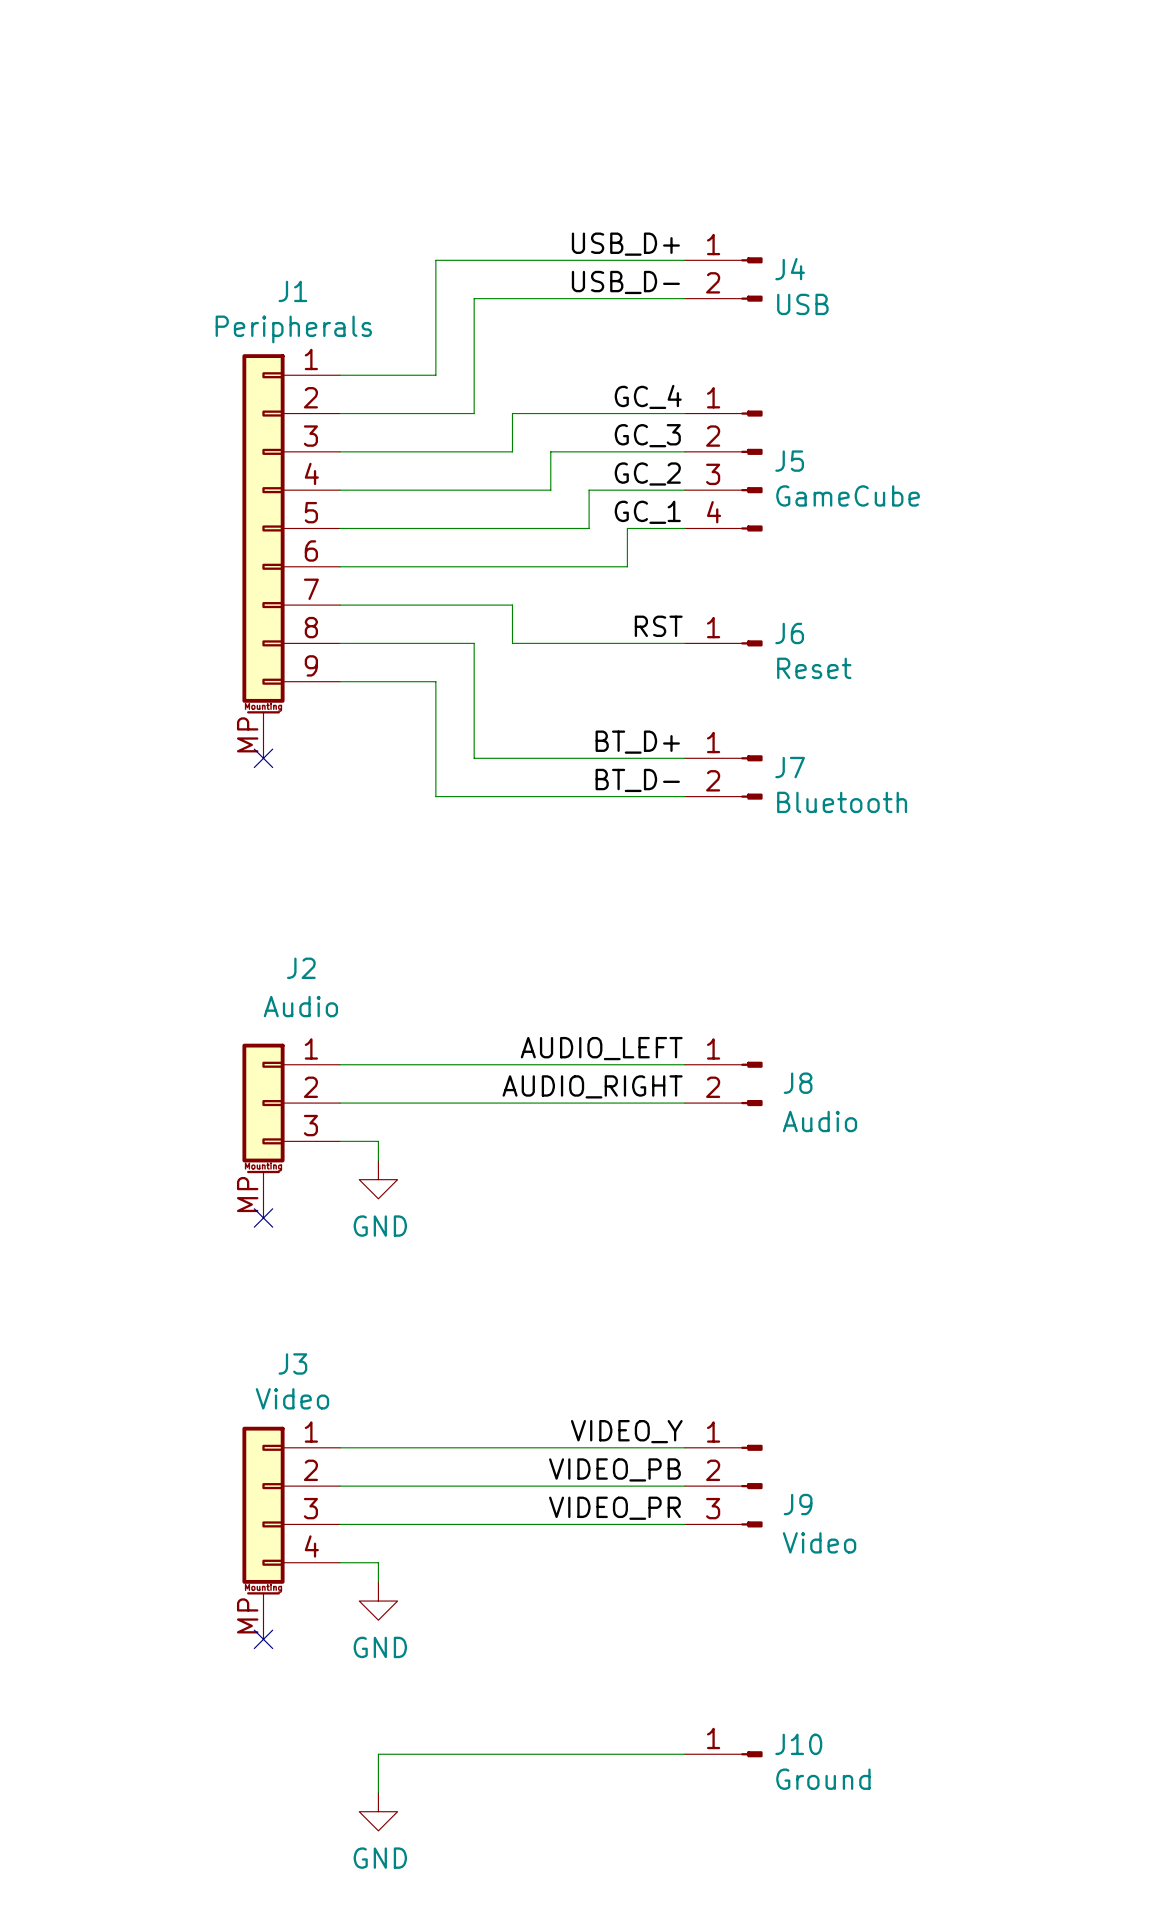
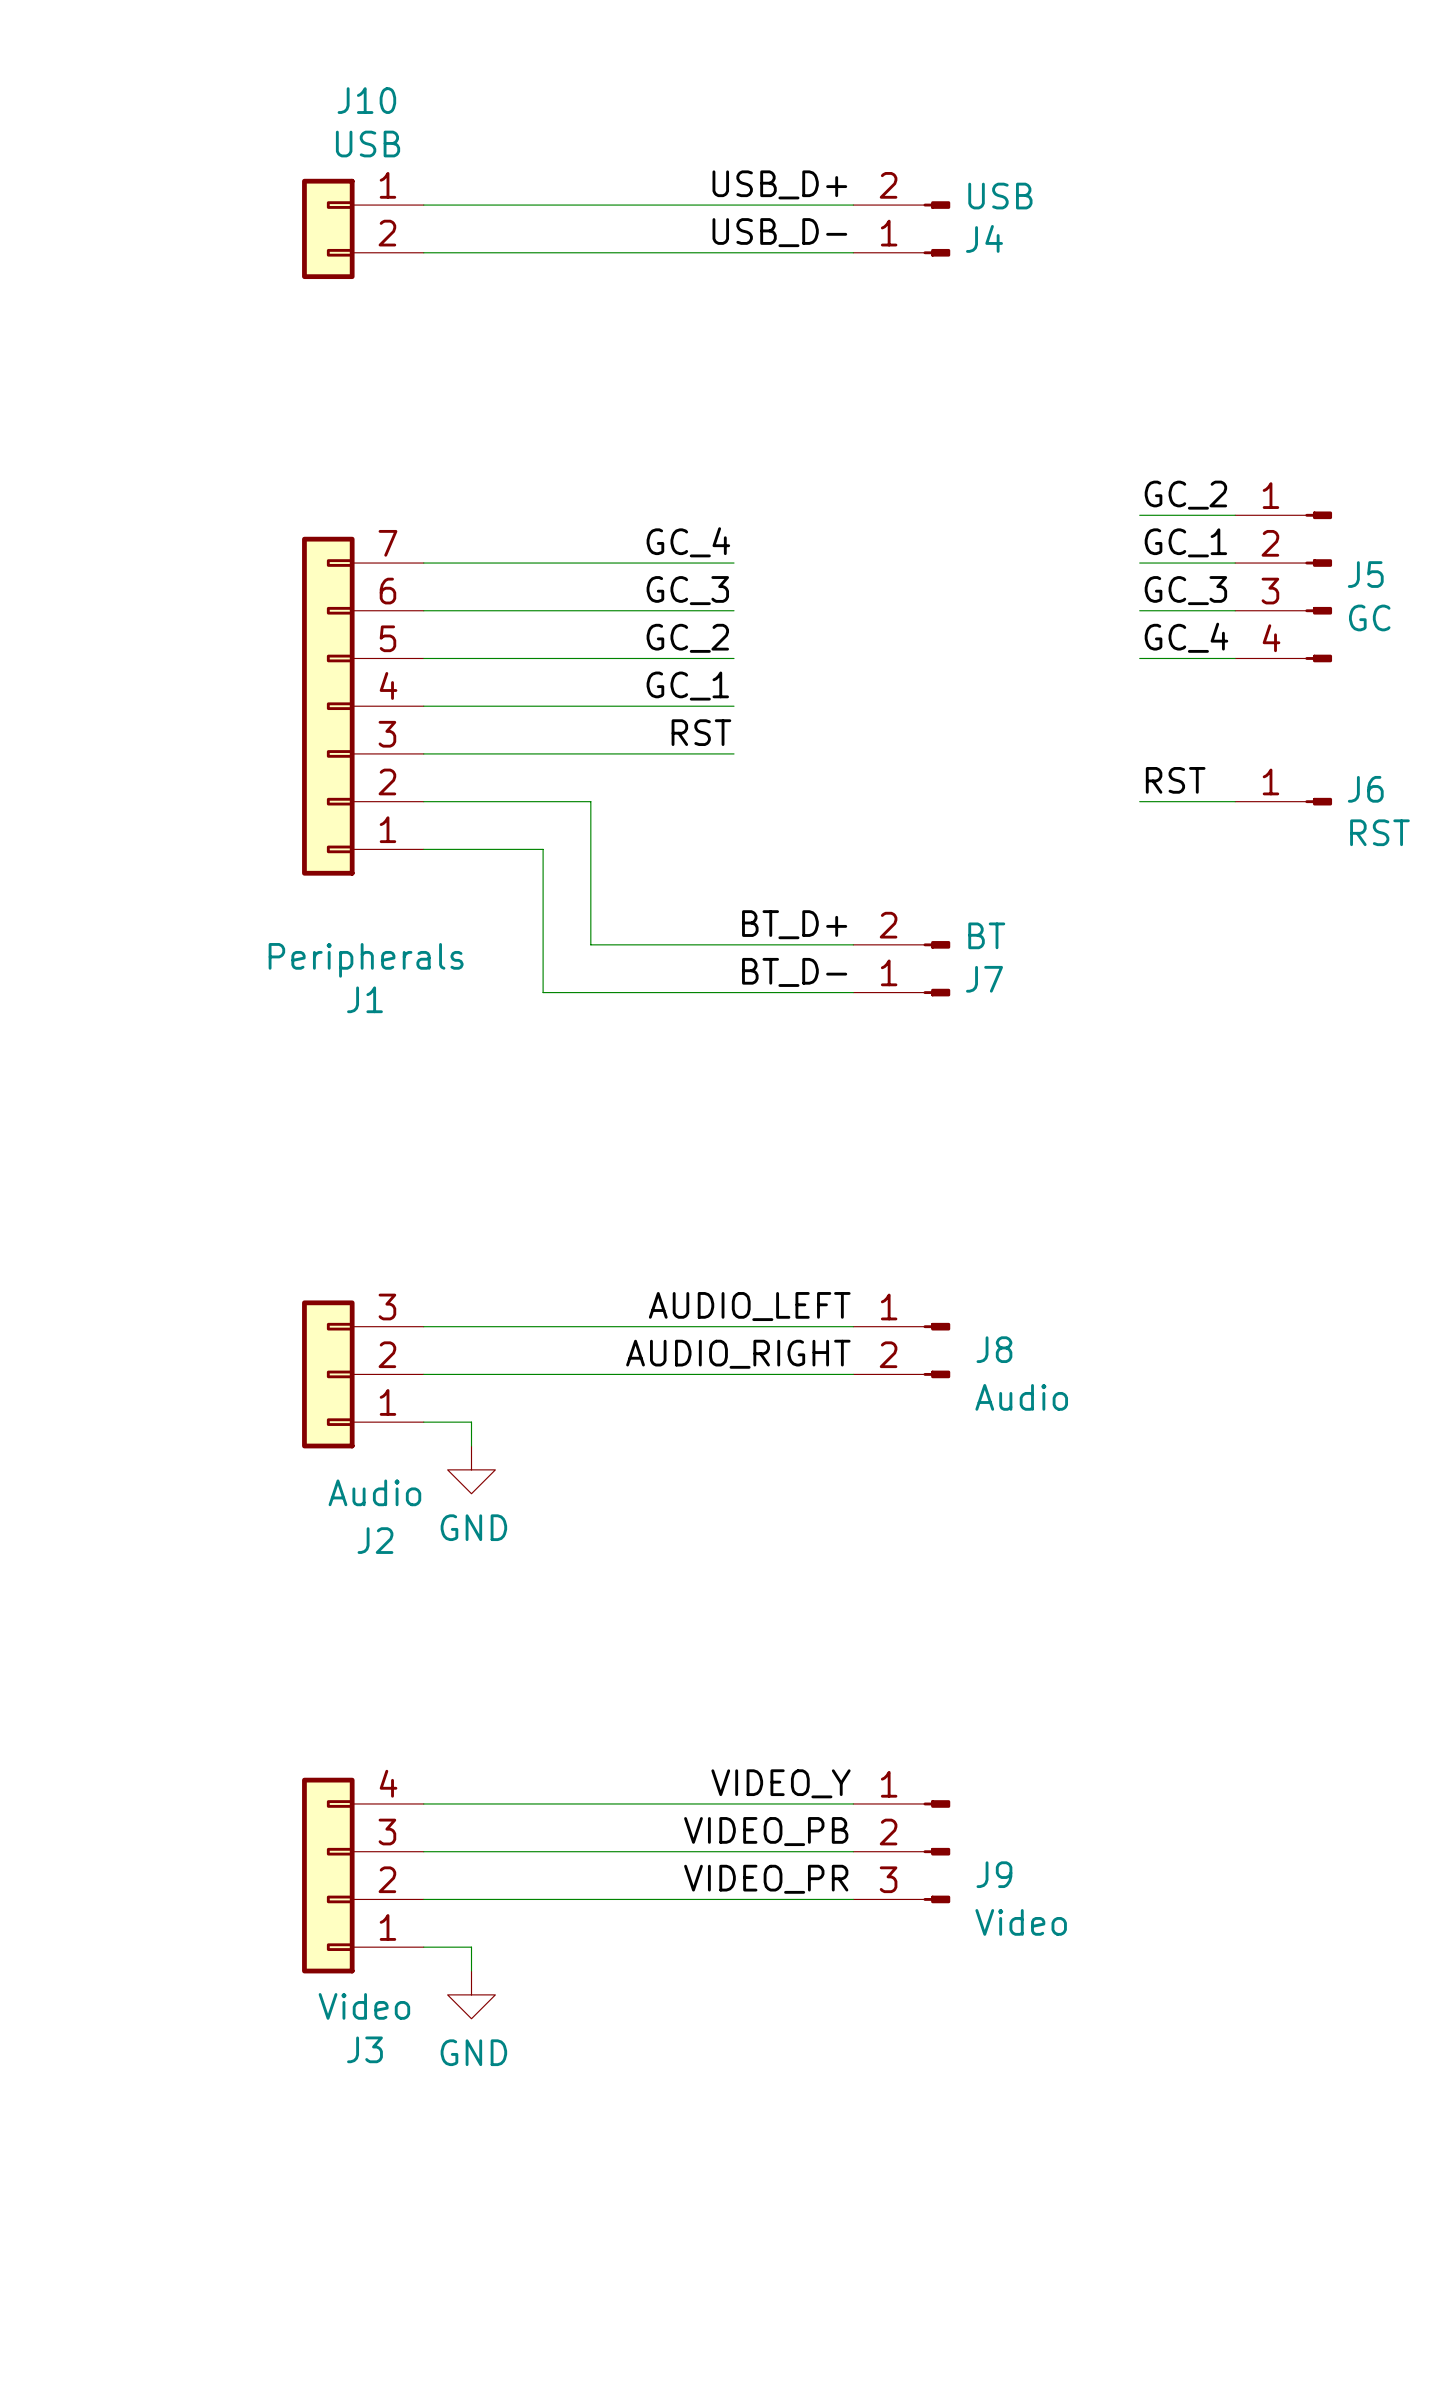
wire: none -> (423, 205) (853, 205)
wire: none -> (423, 252) (853, 252)
label position: USB_D+ (625, 244) -> USB_D+ (779, 184)
wire: (684, 260) (435, 260) (435, 375) (340, 375) -> none
J4 position: (723, 279) -> (901, 228)
J4 flip: as is (751, 279) -> up-down (936, 228)
label position: USB_D- (625, 282) -> USB_D- (779, 232)
J1 name position: J1 (292, 291) -> J1 (364, 999)
wire: (684, 298) (474, 298) (474, 413) (340, 413) -> none
J1 value position: Peripherals (293, 329) -> Peripherals (366, 960)
J1 symbol: [242, 354, 341, 759] -> [302, 536, 424, 876]
label position: GC_4 (648, 396) -> GC_4 (688, 542)
label: none -> GC_2 (1185, 495)
wire: (684, 413) (512, 413) (512, 451) -> (686, 563) (638, 563)
wire: none -> (1139, 515) (1235, 515)
label position: GC_3 (647, 435) -> GC_3 (687, 590)
label: none -> GC_1 (1185, 542)
wire: (550, 451) (550, 490) -> (734, 610) (686, 610)
wire: (589, 451) (684, 451) -> none
wire: none -> (1139, 563) (1235, 563)
J5 position: (723, 471) -> (1283, 586)
label position: GC_2 (647, 473) -> GC_2 (687, 638)
label: none -> GC_3 (1185, 590)
wire: (684, 490) (589, 490) (589, 528) -> none
wire: none -> (1139, 610) (1235, 610)
J5 value: GameCube (848, 495) -> GC (1369, 617)
label: none -> GC_4 (1186, 637)
label position: GC_1 (647, 512) -> GC_1 (687, 686)
wire: (684, 528) (627, 528) (627, 566) (589, 566) -> none
wire: none -> (1139, 658) (1235, 658)
wire: (512, 605) (512, 643) (684, 643) -> (638, 753) (734, 753)
label position: RST (658, 626) -> RST (701, 732)
label: none -> RST (1175, 780)
J6 position: (723, 643) -> (1283, 801)
wire: none -> (1139, 801) (1235, 801)
J6 value: Reset (814, 668) -> RST (1379, 832)
no-connect mark: (263, 758) -> none
J7 flip: as is (751, 777) -> up-down (936, 968)
J7 value: Bluetooth (842, 802) -> BT (986, 935)
J2 name position: J2 (301, 968) -> J2 (375, 1540)
J2 value position: Audio (300, 1006) -> Audio (374, 1492)
J2 symbol: [242, 1043, 341, 1218] -> [302, 1300, 424, 1449]
no-connect mark: (263, 1217) -> none
J3 name position: J3 (292, 1363) -> J3 (364, 2049)
J3 value position: Video (292, 1398) -> Video (364, 2006)
J3 symbol: [242, 1426, 341, 1640] -> [302, 1777, 424, 1974]
no-connect mark: (263, 1639) -> none
J10 name position: J10 (798, 1744) -> J10 (366, 100)
J10 symbol: [684, 1751, 763, 1758] -> [302, 178, 424, 280]
wire: (684, 1754) (378, 1754) (378, 1792) -> none
J10 value: Ground (823, 1779) -> USB (368, 144)
power symbol: GND (378, 1811) -> none

